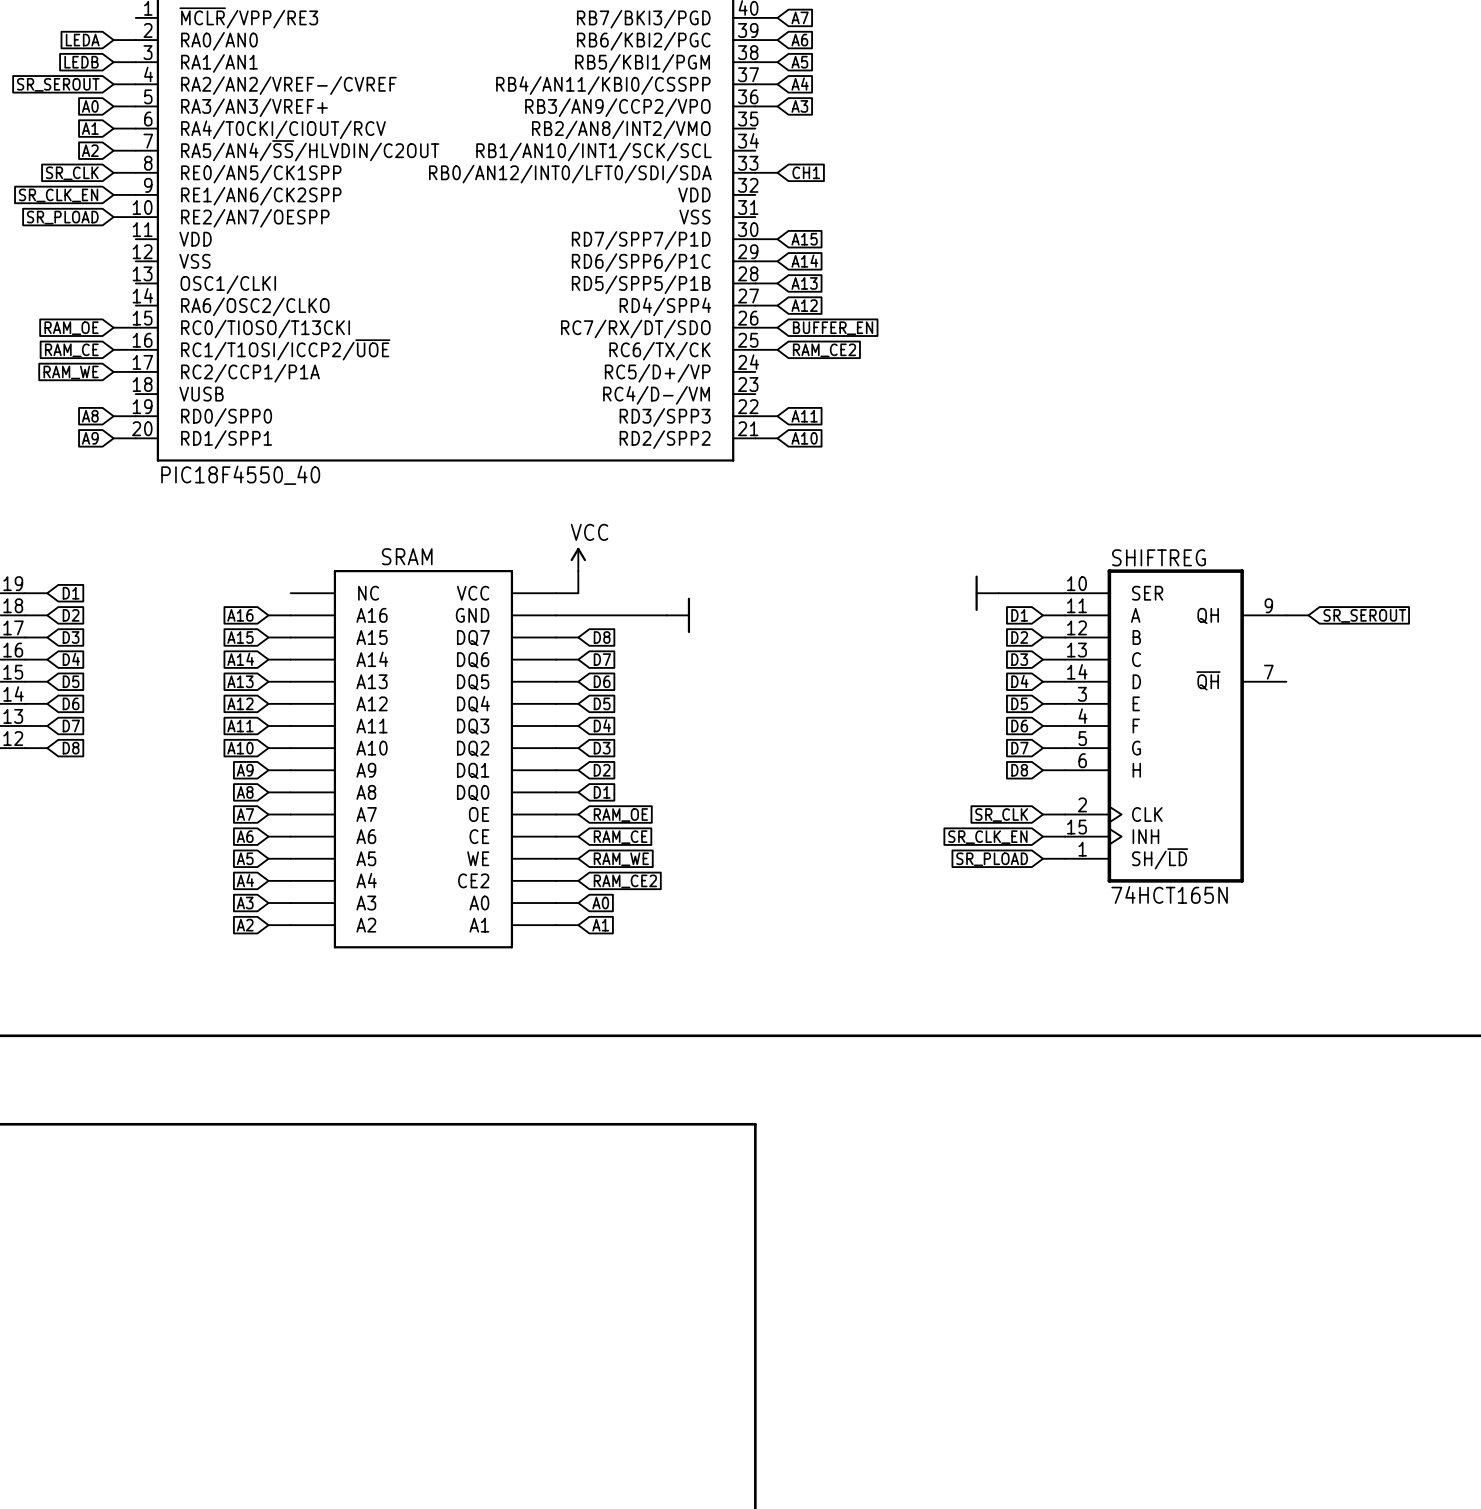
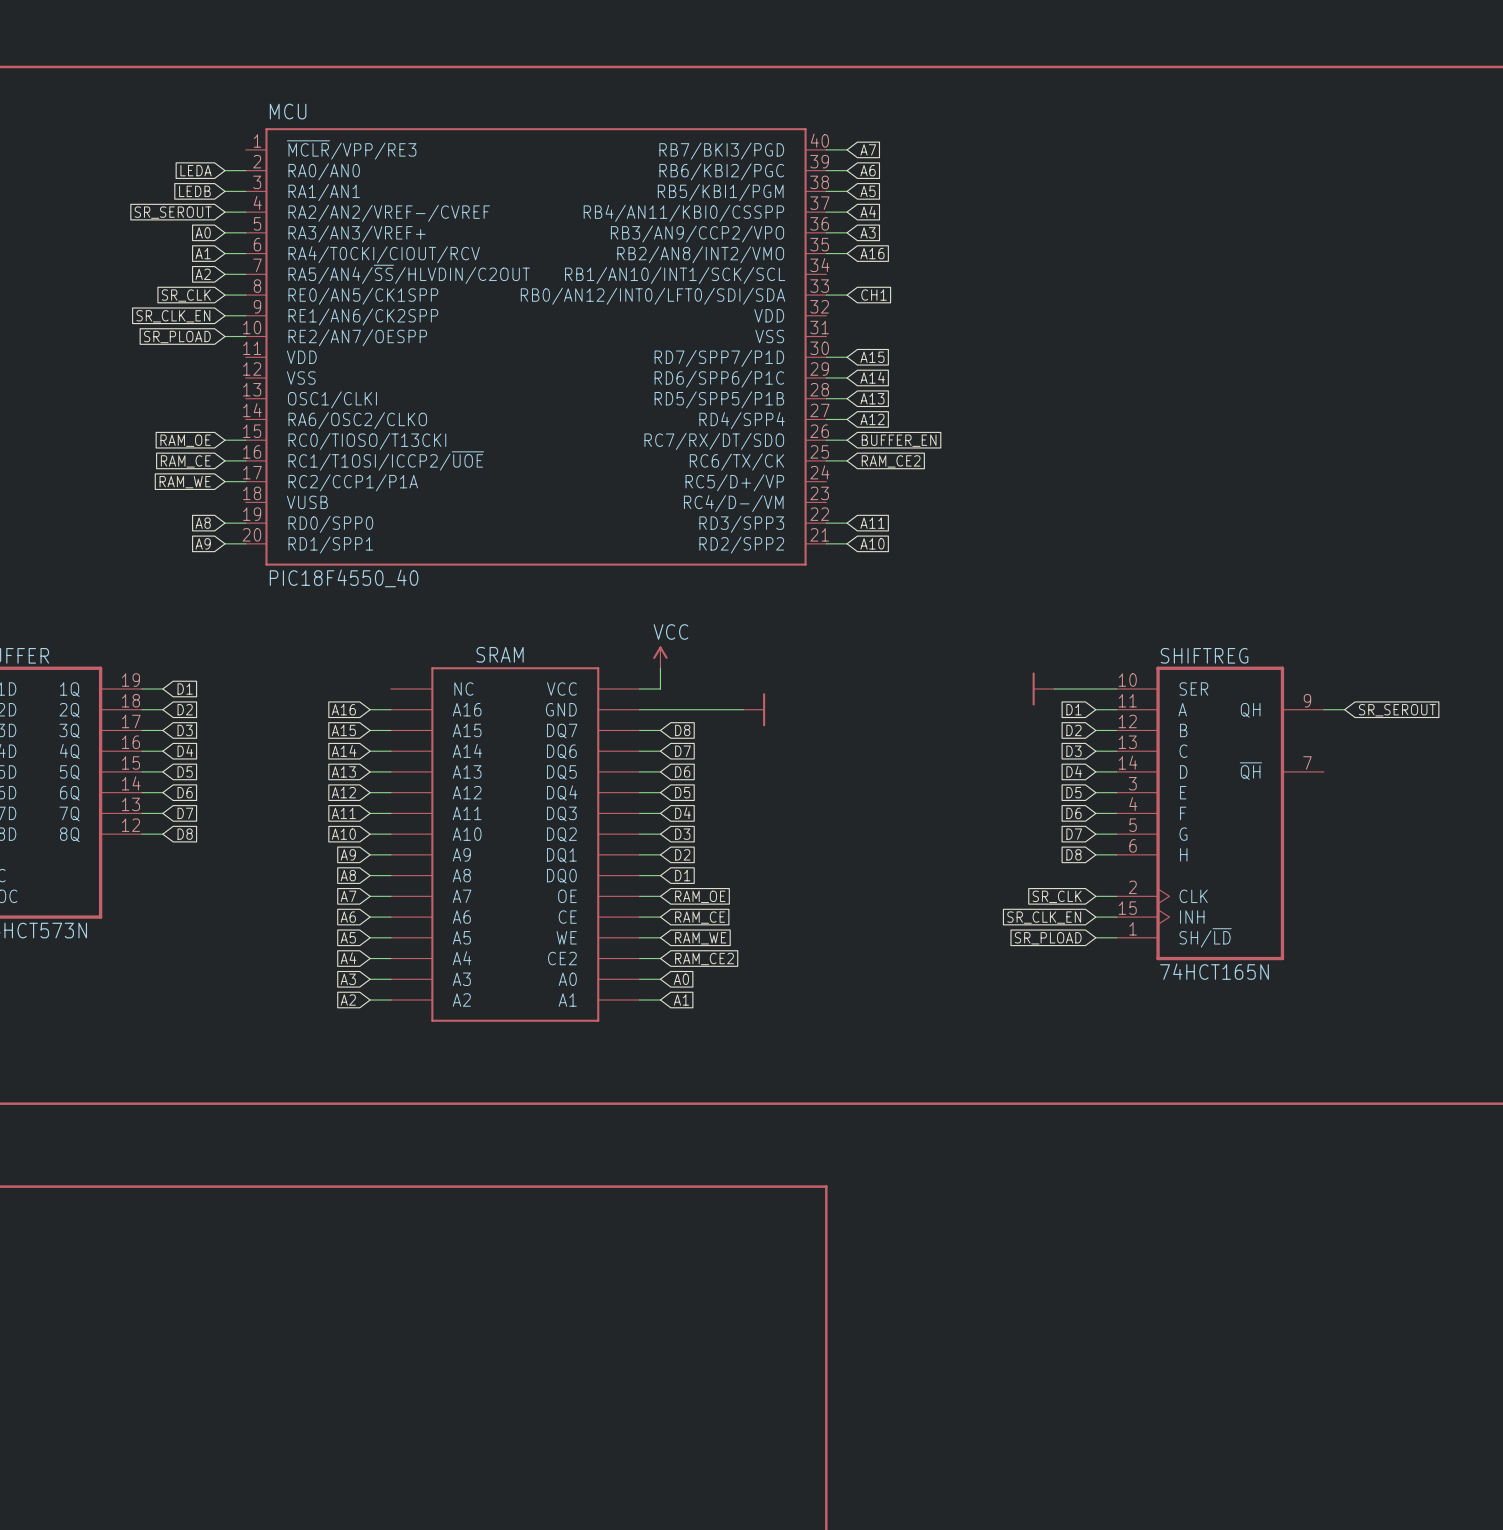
wire: none -> (826, 253) (847, 253)
global label: none -> A16 (872, 253)

